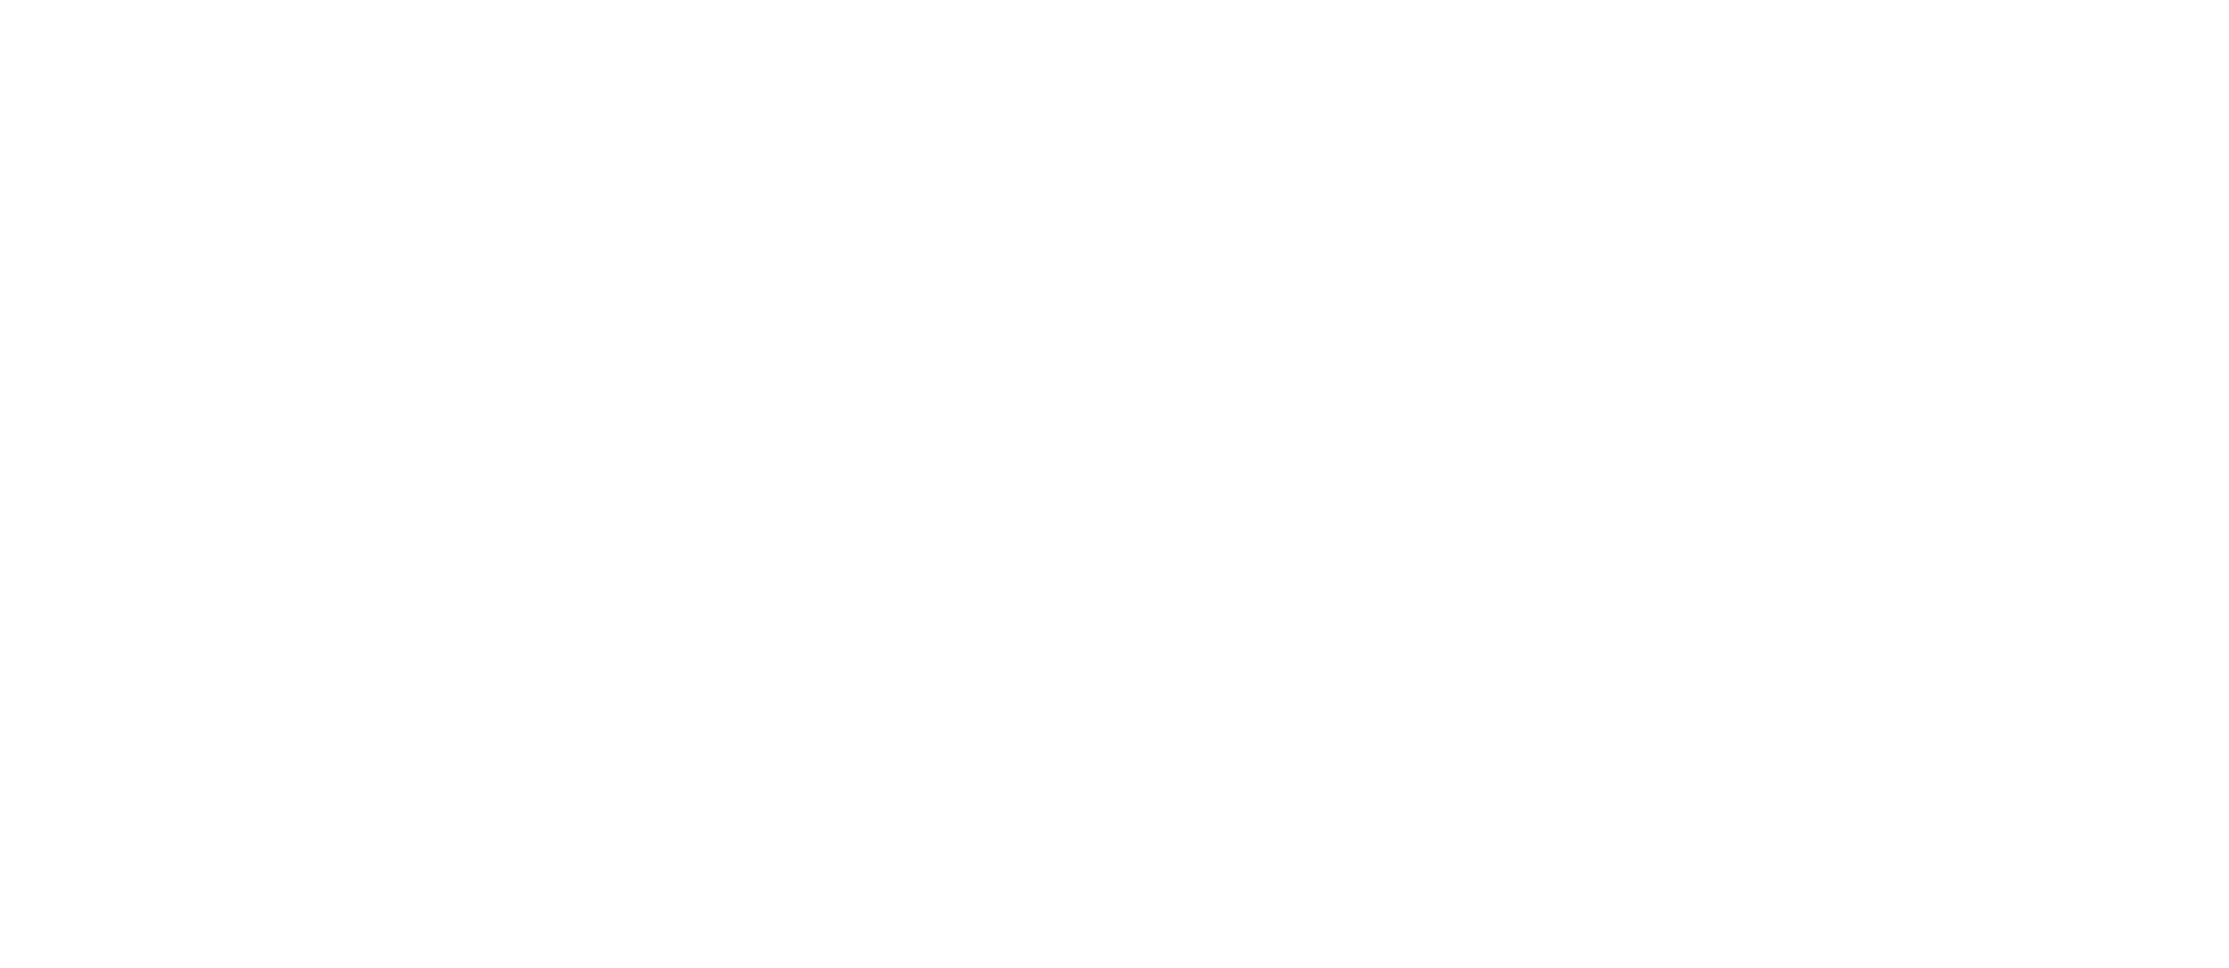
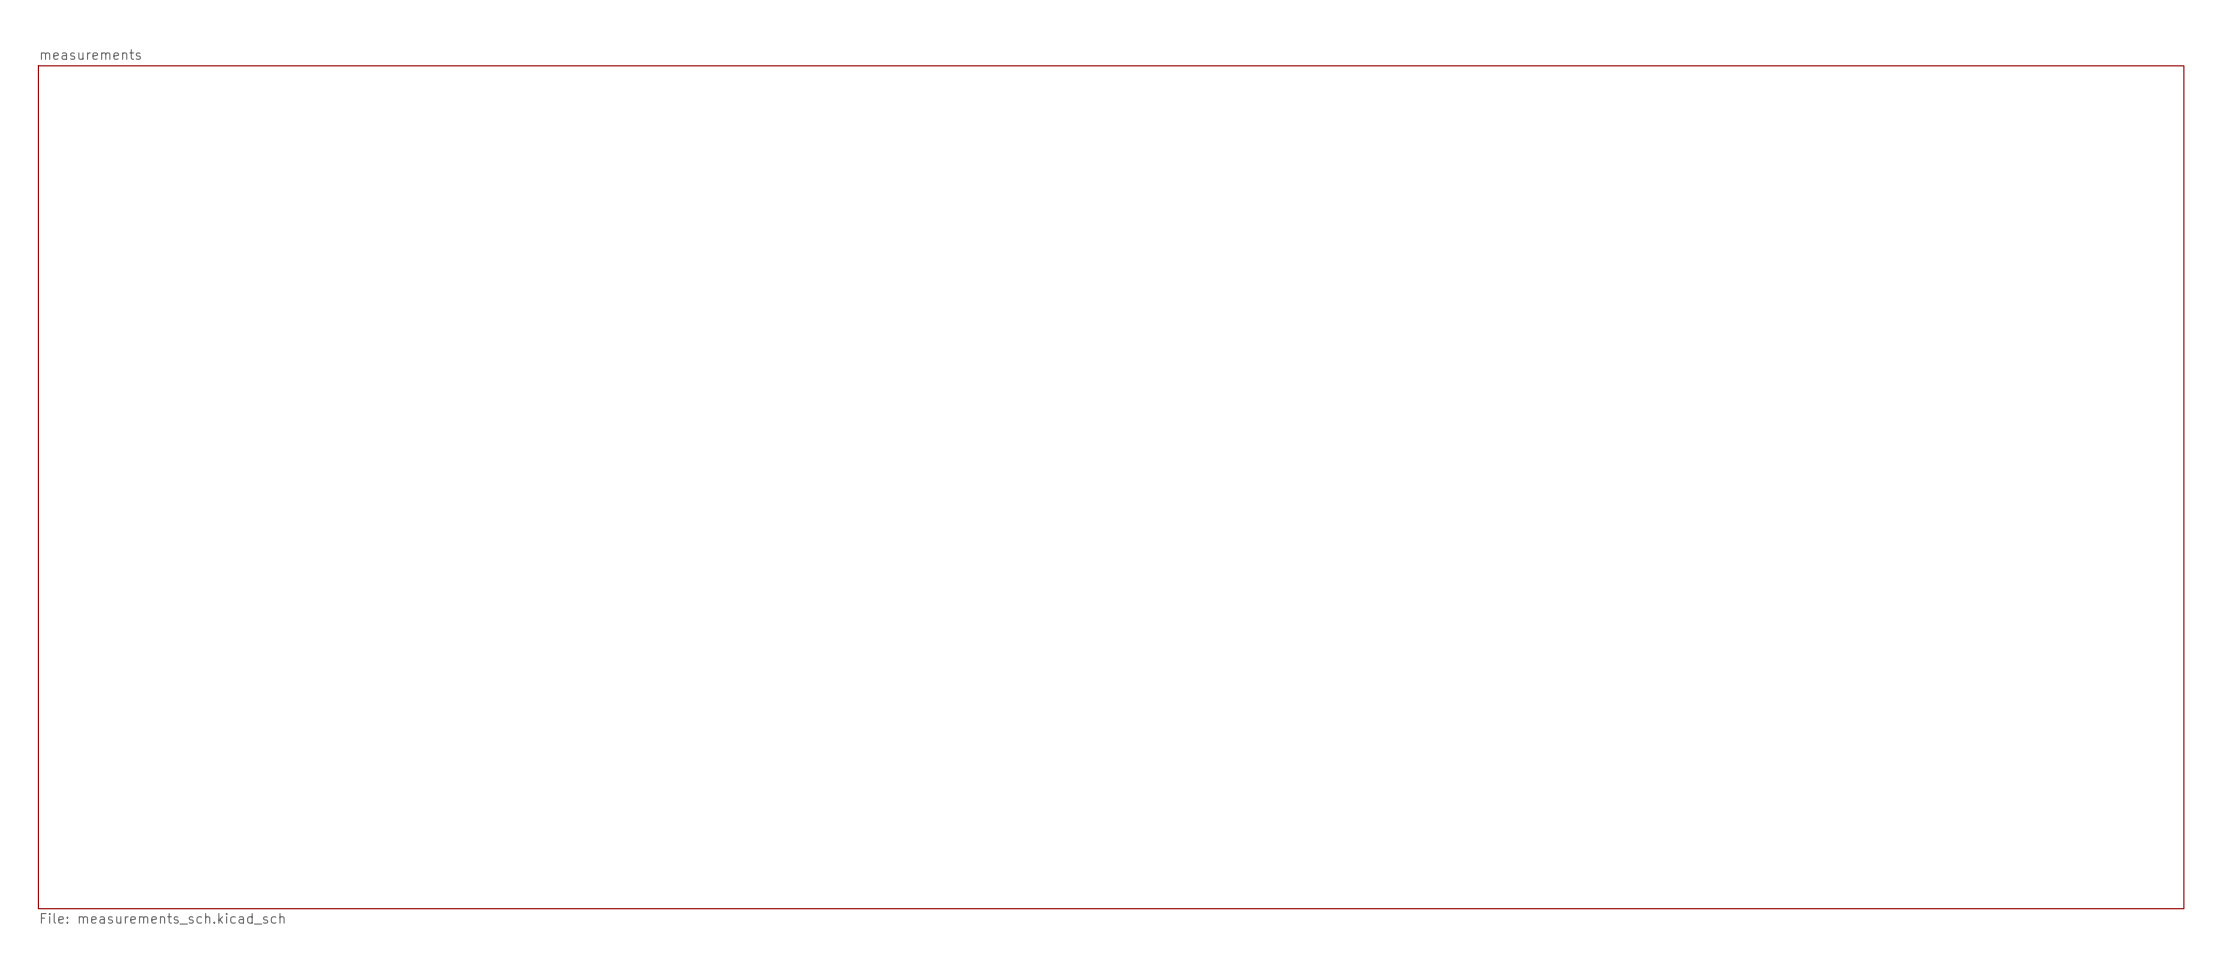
sheet measurements: none -> File: measurements_sch.kicad_sch (1111, 487)

